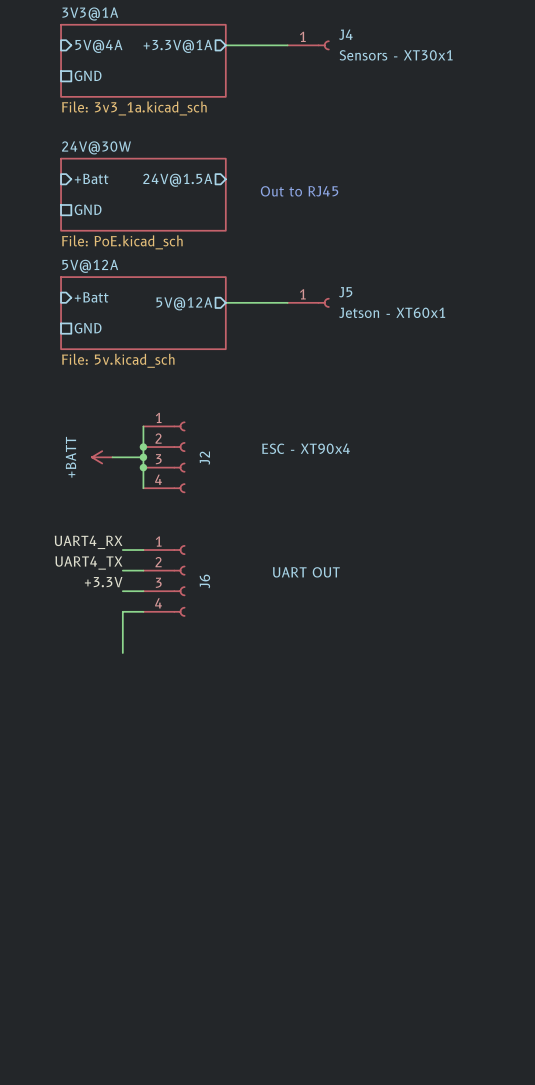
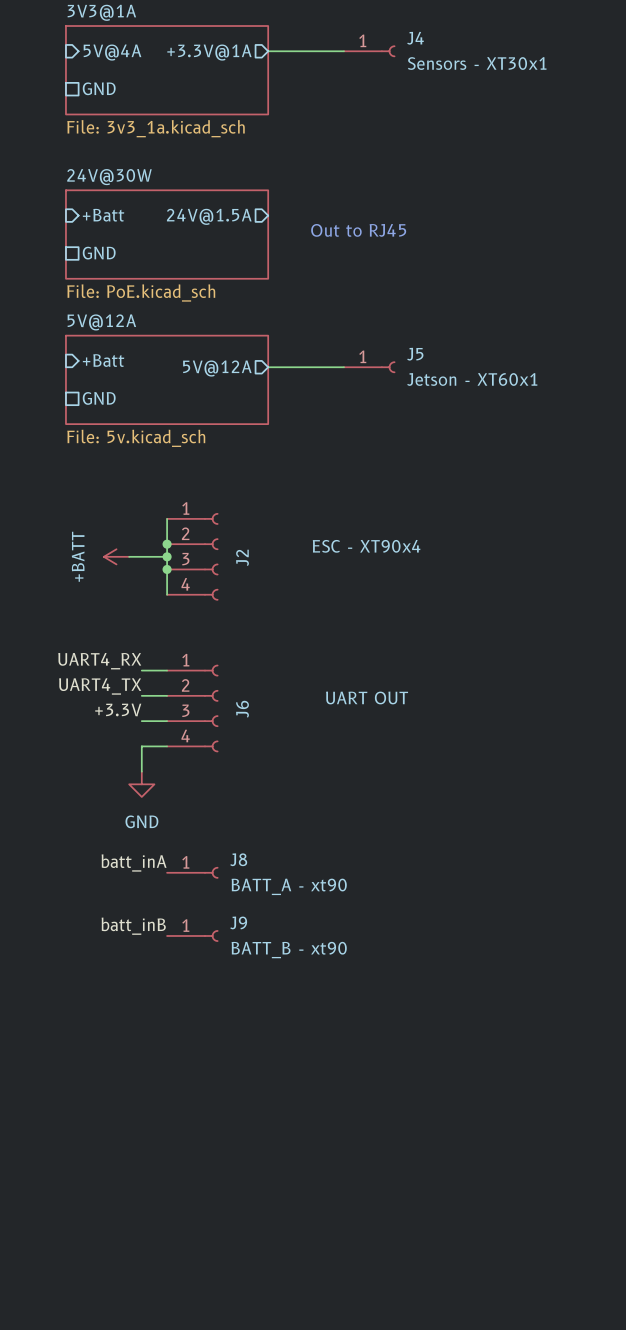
power symbol: none -> GND (141, 784)
label: none -> batt_inA (134, 862)
J8: none -> BATT_A - xt90 (192, 872)
label: none -> batt_inB (133, 926)
J9: none -> BATT_B - xt90 (192, 935)

